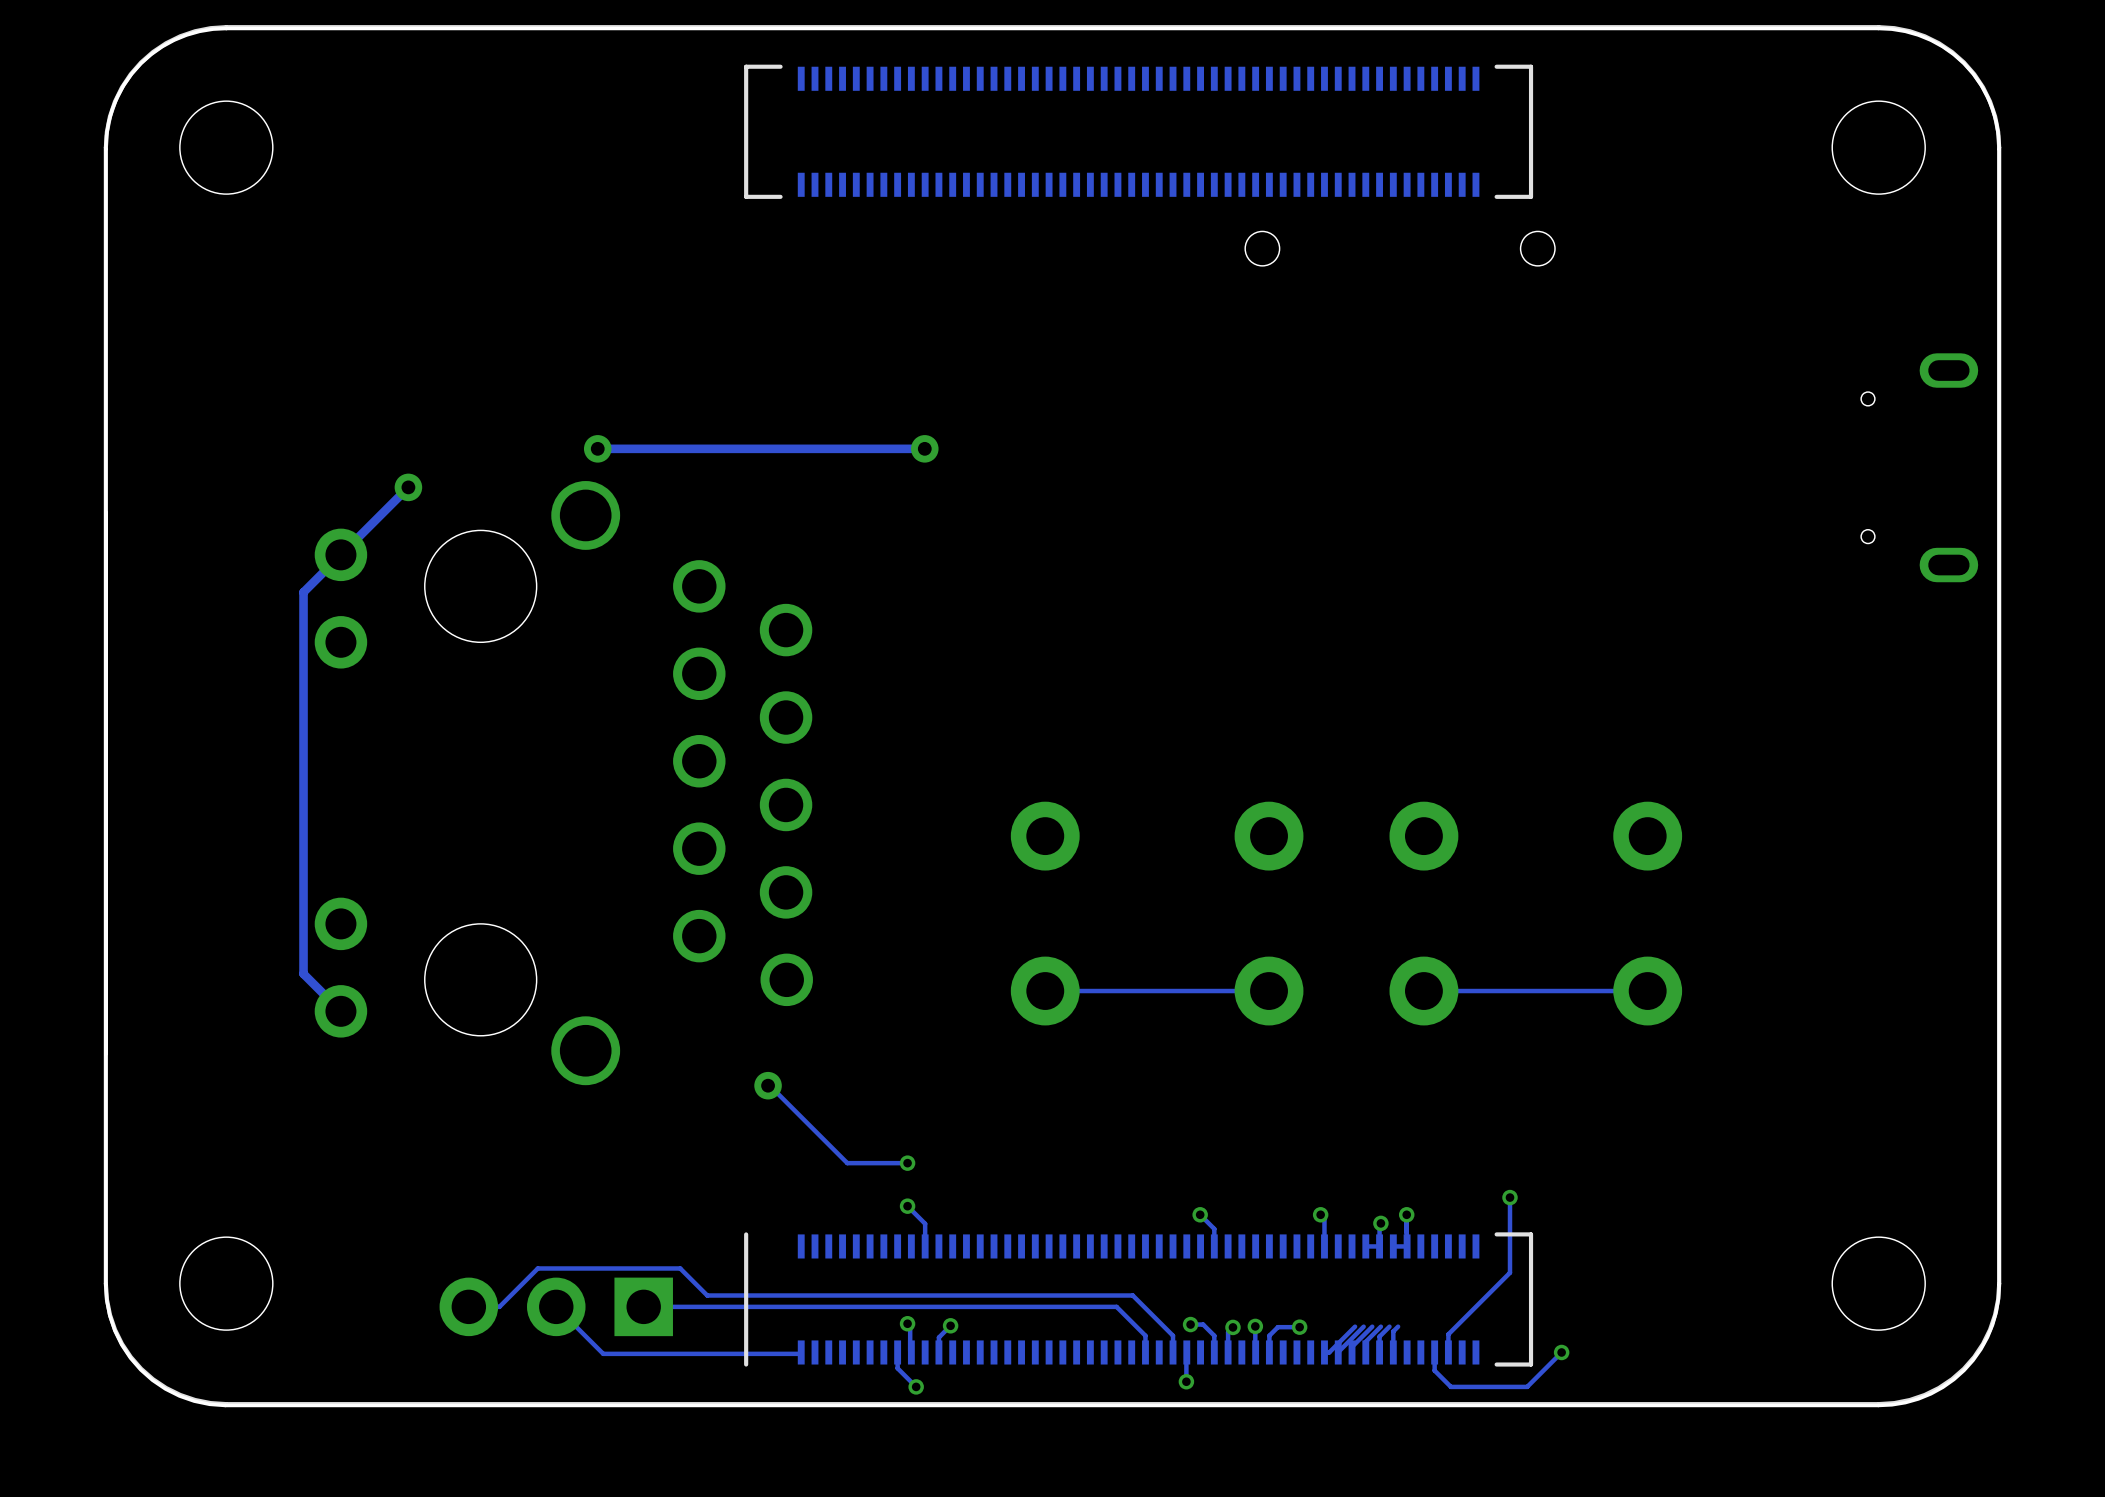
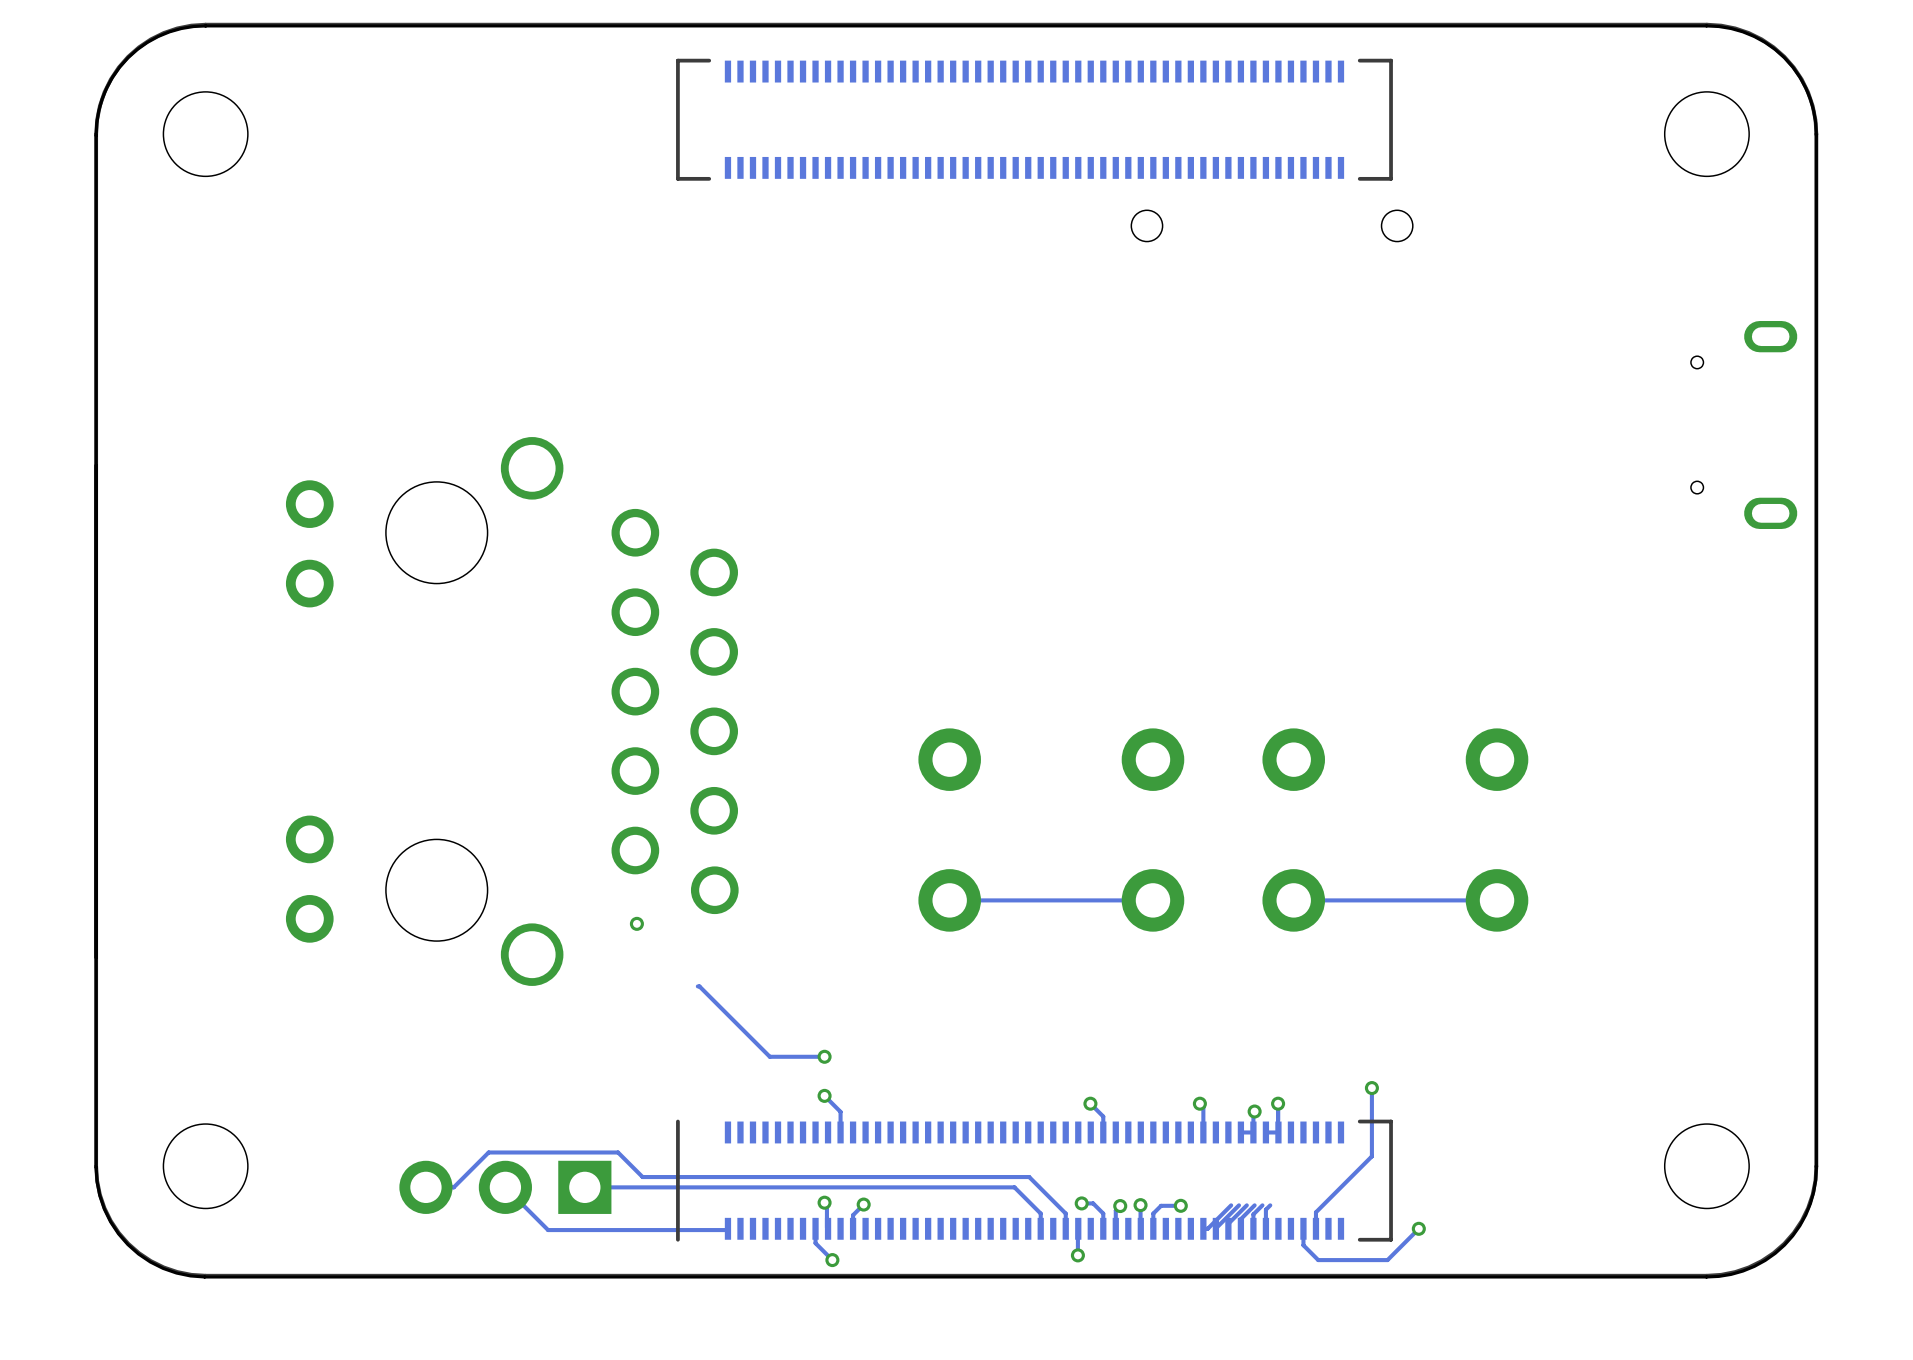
via: (597, 448) -> none
track: (924, 448) (597, 448) -> none
via: (924, 448) -> none
track: (408, 487) (303, 592) (303, 973) (340, 1011) -> none
via: (408, 487) -> none
via: none -> (636, 923)
via: (768, 1085) -> none

